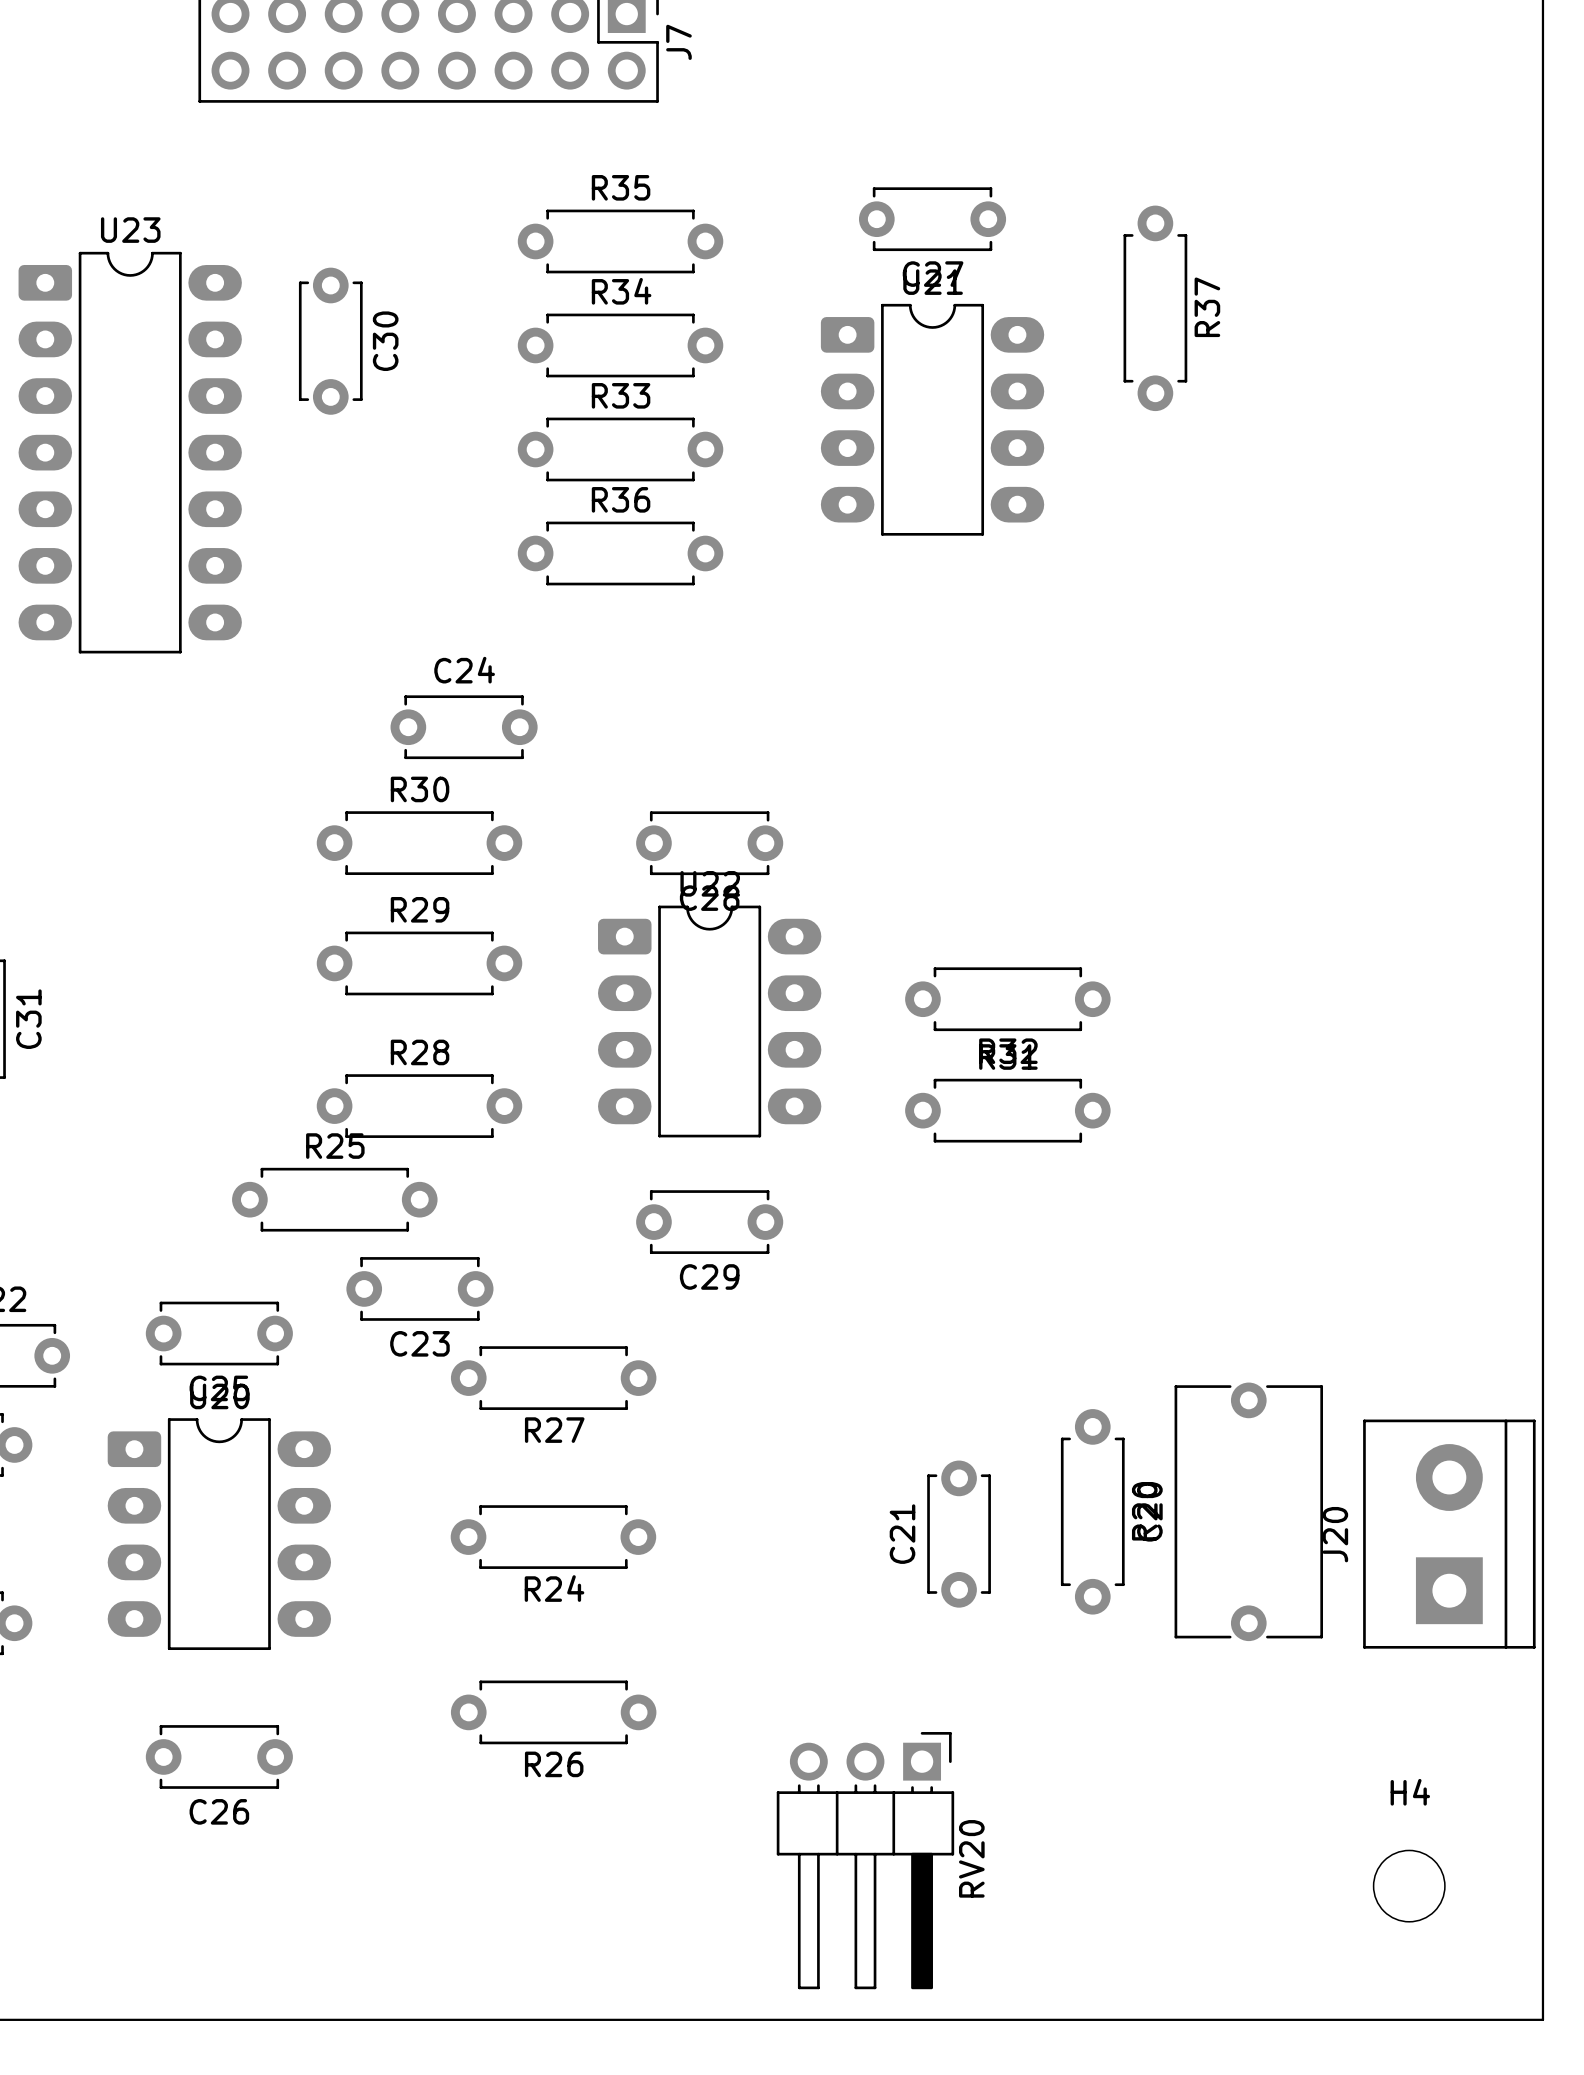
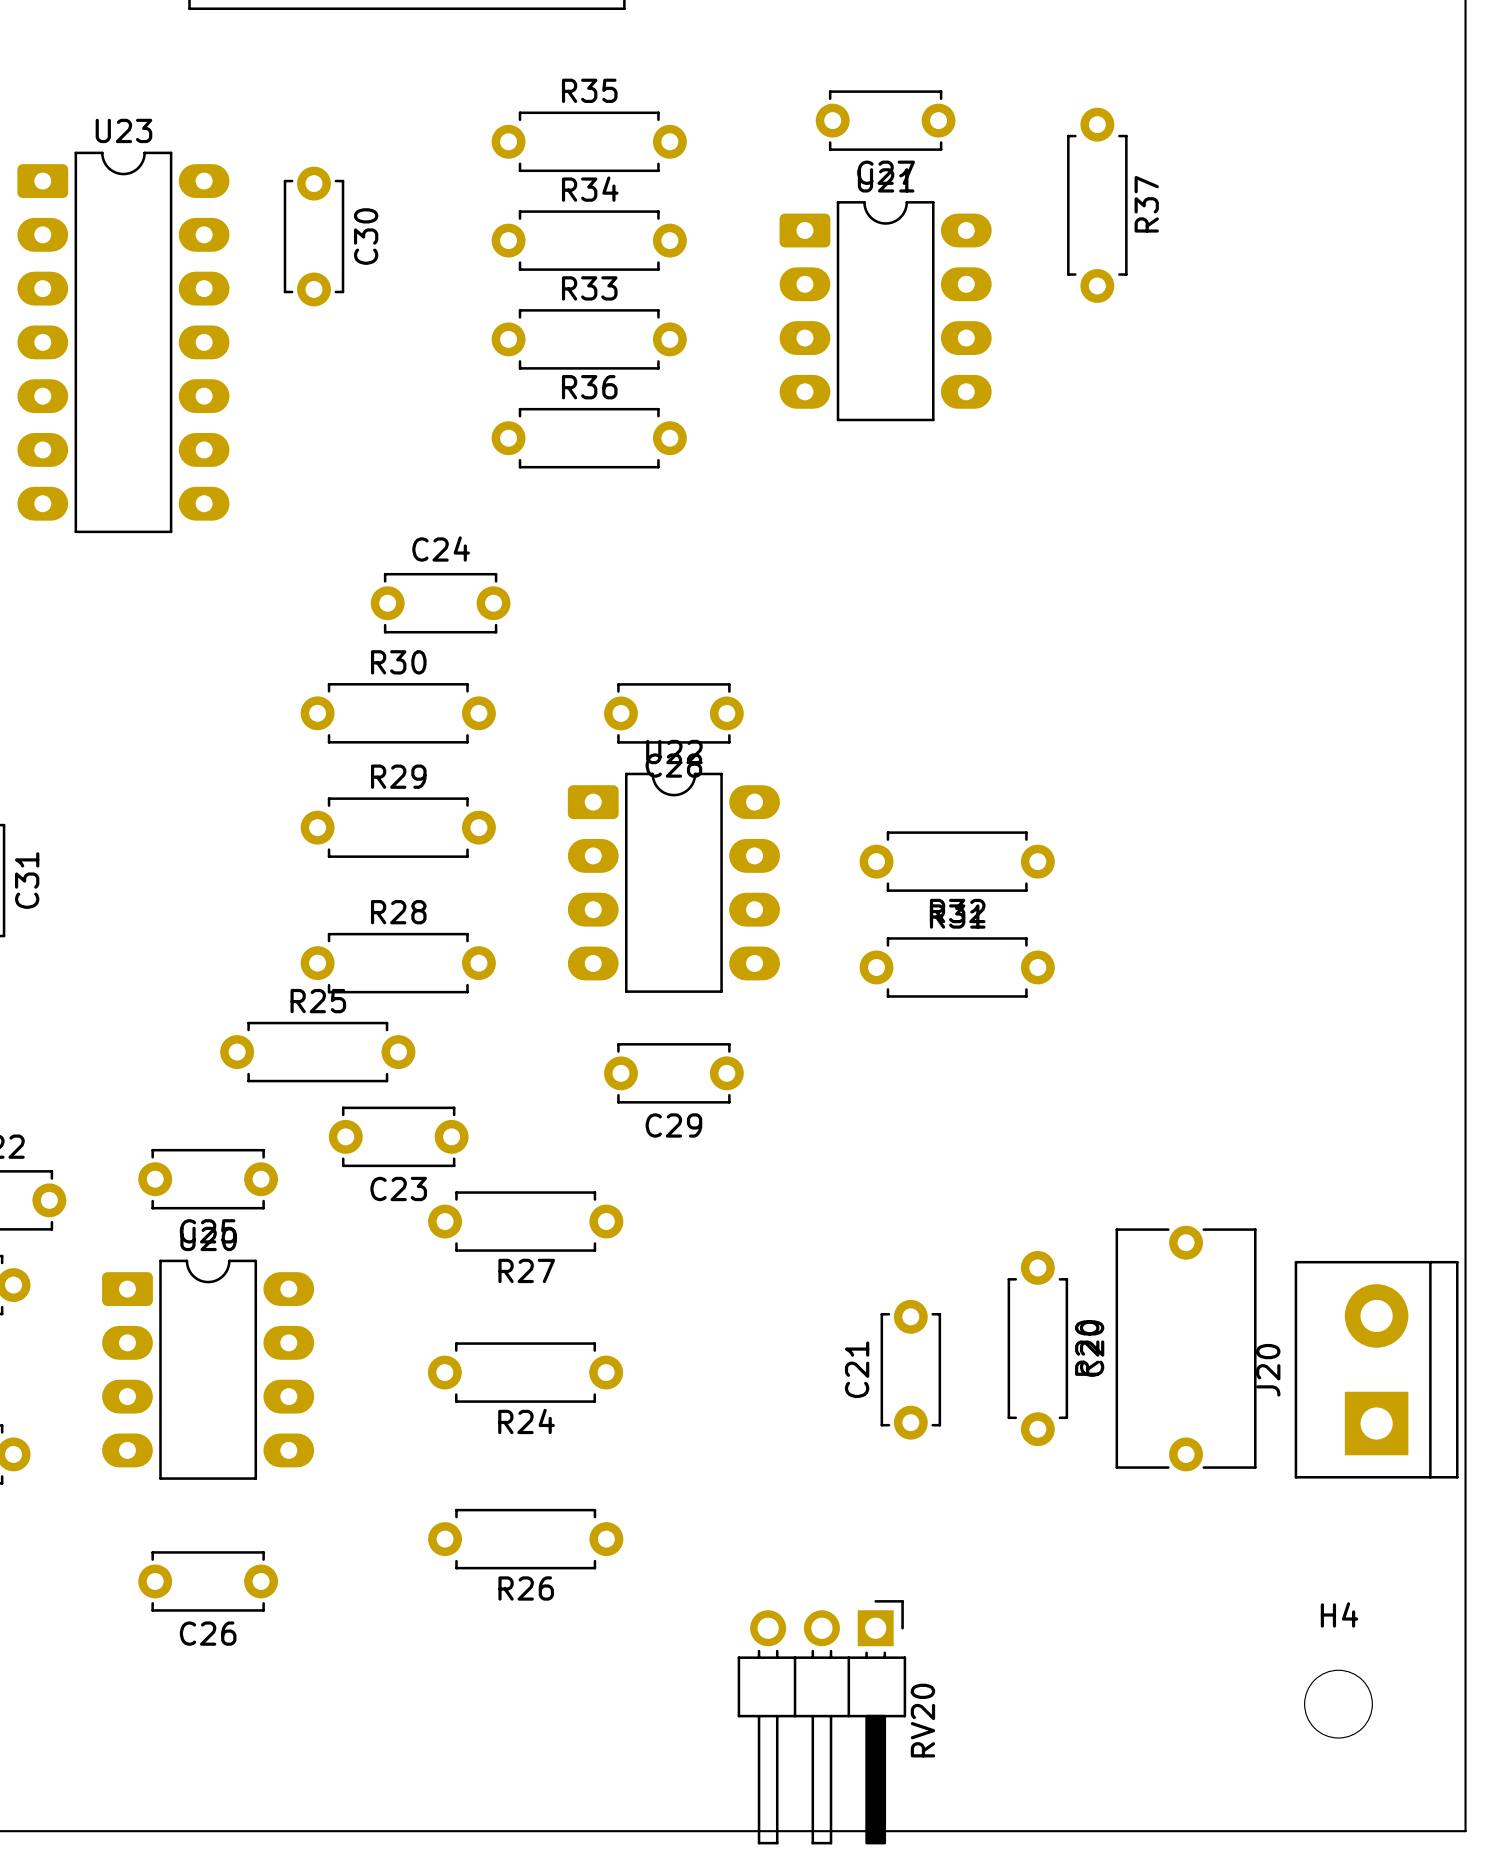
RV20 position: (865, 1860) -> (821, 1722)

